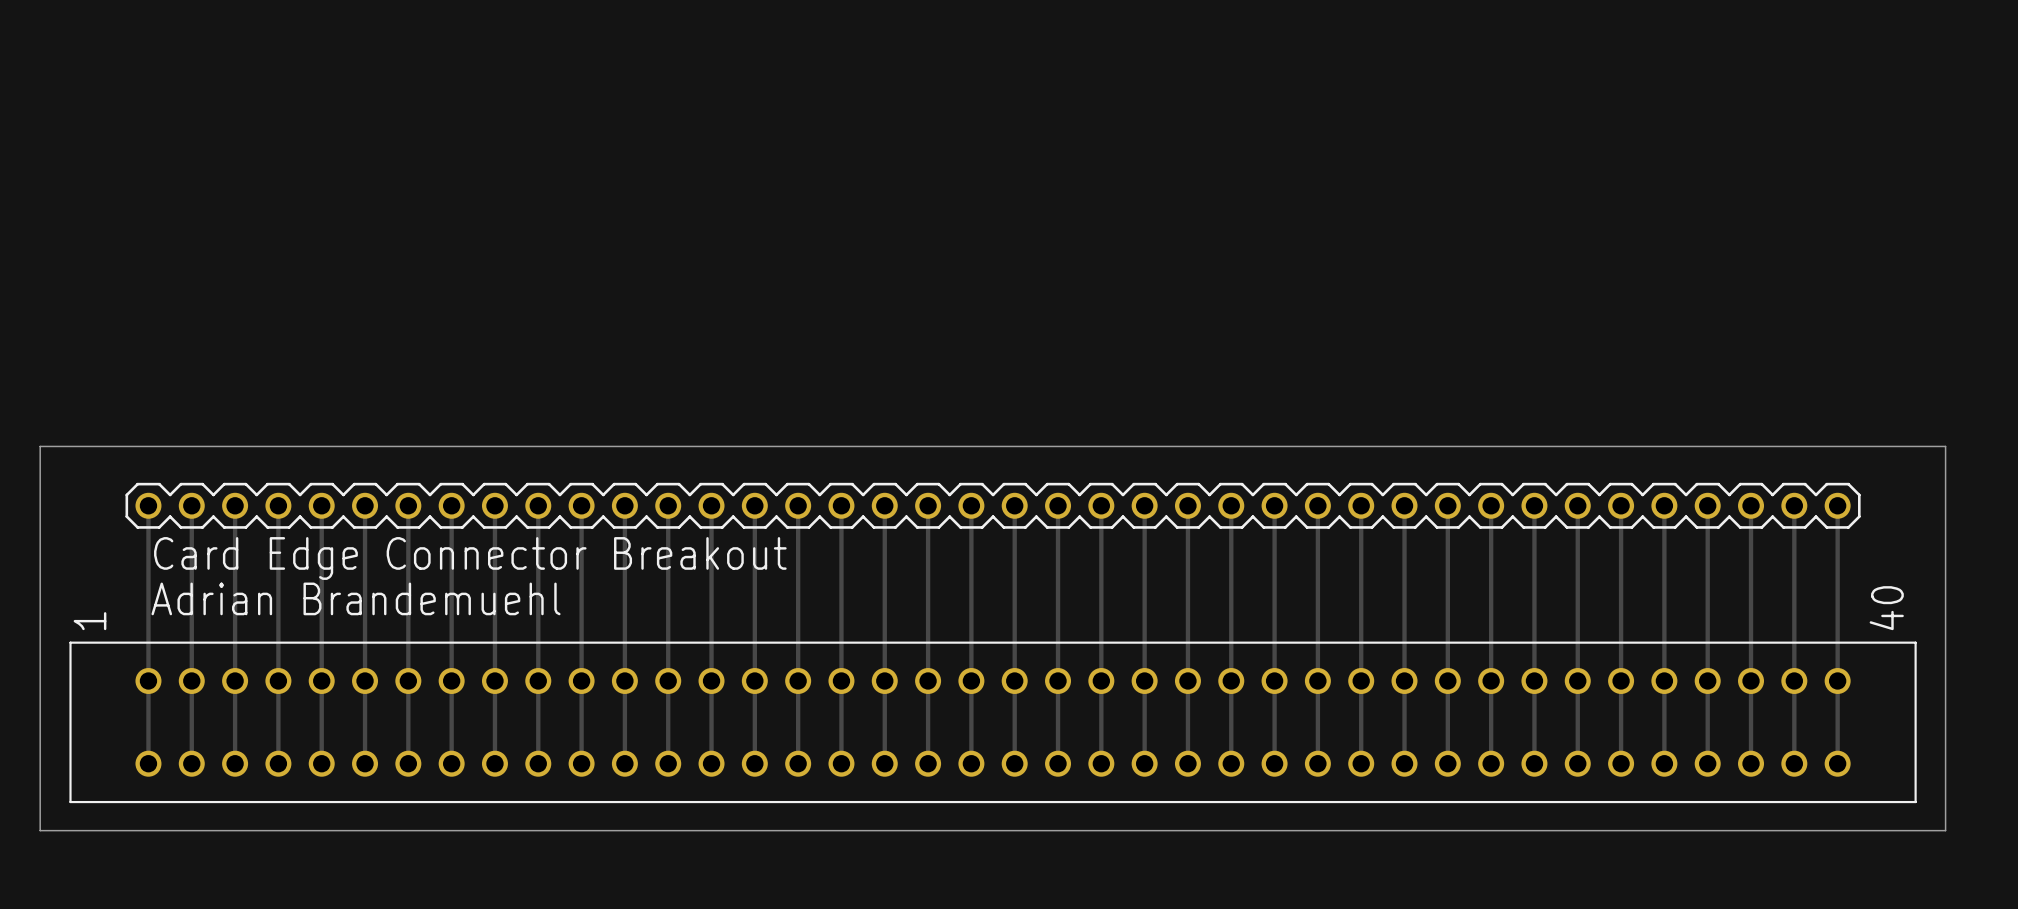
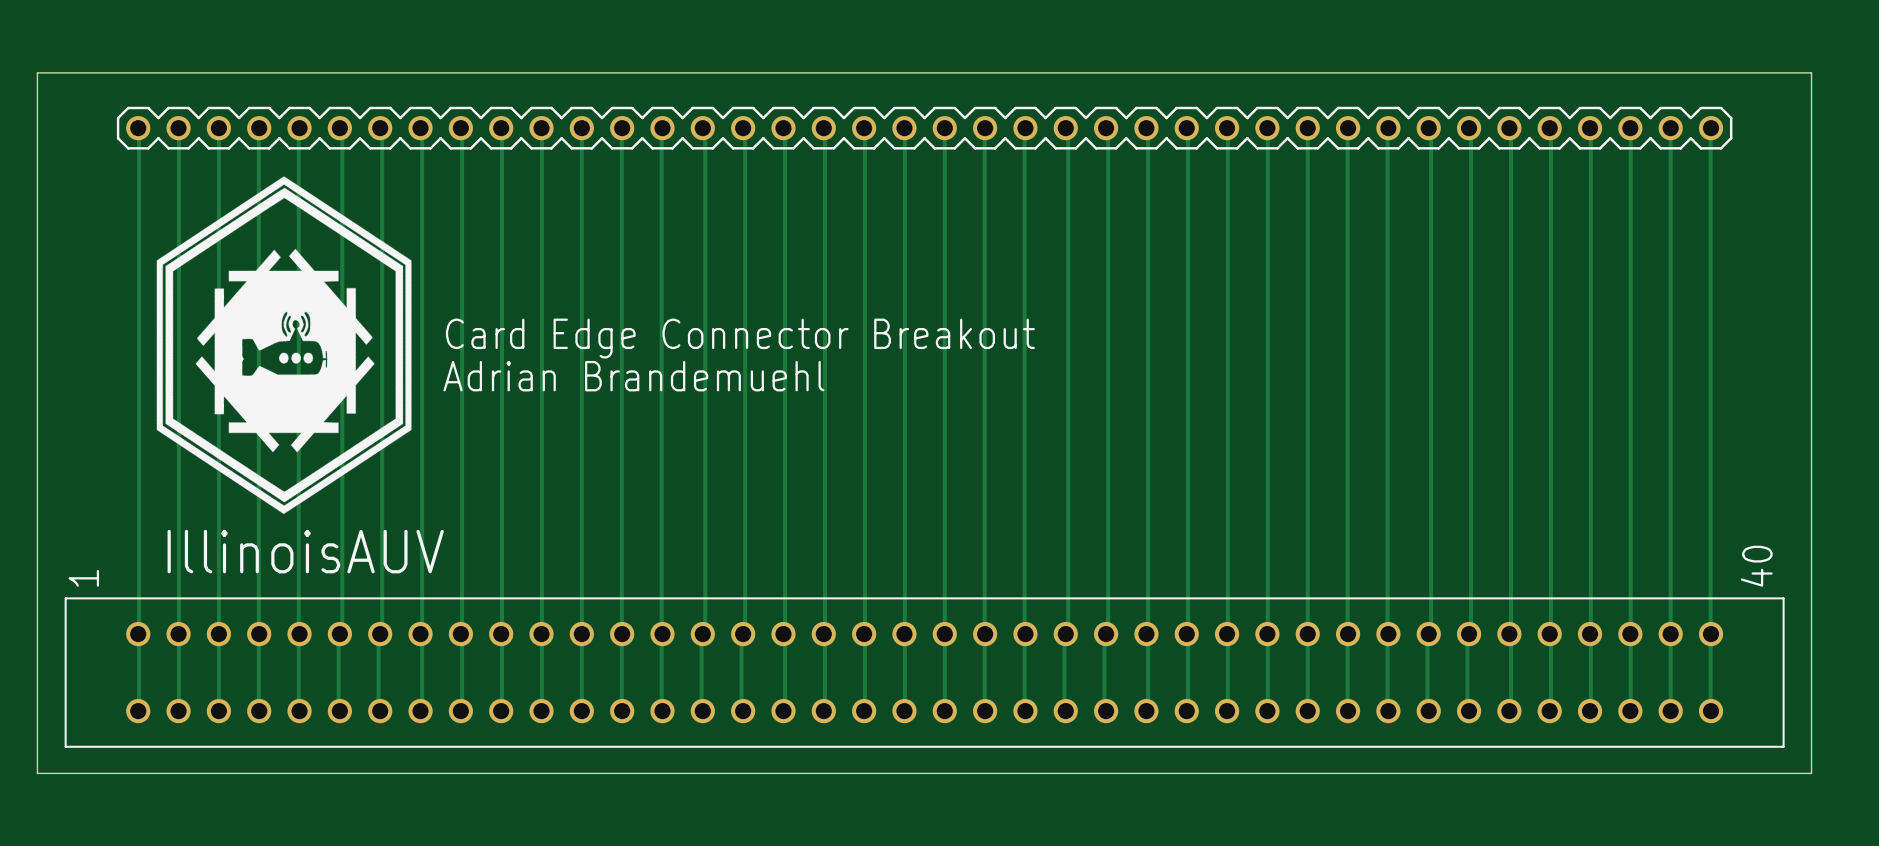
track: none -> (218, 128) (218, 470)
track: none -> (581, 128) (581, 470)
track: none -> (944, 128) (944, 470)
track: none -> (1307, 128) (1307, 470)
track: none -> (1670, 128) (1670, 470)
drawing: none -> [156, 176, 412, 514]
board edge: (40, 446) (1945, 446) -> (37, 415) (37, 72) (1811, 72) (1811, 415)
track: (148, 505) (148, 763) -> (138, 128) (138, 711)
track: (191, 505) (191, 763) -> (178, 128) (178, 711)
track: (278, 505) (278, 763) -> (259, 128) (259, 711)
track: (321, 505) (321, 763) -> (299, 128) (299, 711)
track: (365, 505) (365, 763) -> (339, 128) (342, 130) (342, 631) (338, 635) (339, 711)
track: (408, 505) (408, 763) -> (380, 128) (382, 130) (382, 631) (378, 635) (378, 708) (380, 711)
track: (451, 505) (451, 763) -> (420, 128) (422, 130) (422, 631) (420, 634) (422, 635) (422, 708) (420, 711)
track: (494, 505) (494, 763) -> (460, 128) (460, 711)
track: (538, 505) (538, 763) -> (501, 128) (501, 711)
track: (581, 505) (581, 763) -> (541, 128) (541, 711)
track: (668, 505) (668, 763) -> (622, 128) (622, 711)
track: (711, 505) (711, 763) -> (662, 128) (662, 711)
track: (754, 505) (754, 763) -> (702, 128) (705, 130) (705, 631) (701, 635) (702, 711)
track: (798, 505) (798, 763) -> (743, 128) (745, 130) (745, 631) (741, 635) (741, 708) (743, 711)
track: (841, 505) (841, 763) -> (783, 128) (785, 130) (785, 631) (783, 634) (785, 635) (785, 708) (783, 711)
track: (884, 505) (884, 763) -> (823, 128) (823, 711)
track: (928, 505) (928, 763) -> (864, 128) (864, 711)
track: (971, 505) (971, 763) -> (904, 128) (904, 711)
part position: (993, 505) -> (924, 128)
track: (1058, 505) (1058, 763) -> (985, 128) (985, 711)
track: (1101, 505) (1101, 763) -> (1025, 128) (1025, 711)
track: (1144, 505) (1144, 763) -> (1065, 128) (1068, 130) (1068, 631) (1064, 635) (1065, 711)
track: (1187, 505) (1187, 763) -> (1106, 128) (1108, 130) (1108, 631) (1104, 635) (1104, 708) (1106, 711)
track: (1231, 505) (1231, 763) -> (1146, 128) (1148, 130) (1148, 631) (1146, 634) (1148, 635) (1148, 708) (1146, 711)
track: (1274, 505) (1274, 763) -> (1186, 128) (1186, 711)
track: (1317, 505) (1317, 763) -> (1227, 128) (1227, 711)
track: (1361, 505) (1361, 763) -> (1267, 128) (1267, 711)
track: (1447, 505) (1447, 763) -> (1348, 128) (1348, 711)
track: (1491, 505) (1491, 763) -> (1388, 128) (1388, 711)
track: (1534, 505) (1534, 763) -> (1428, 128) (1431, 130) (1431, 631) (1427, 635) (1428, 711)
track: (1577, 505) (1577, 763) -> (1469, 128) (1471, 130) (1471, 631) (1467, 635) (1467, 708) (1469, 711)
track: (1621, 505) (1621, 763) -> (1509, 128) (1510, 130) (1510, 631) (1509, 634) (1510, 635) (1510, 708) (1509, 711)
track: (1664, 505) (1664, 763) -> (1549, 128) (1549, 711)
track: (1707, 505) (1707, 763) -> (1590, 128) (1590, 711)
track: (1751, 505) (1751, 763) -> (1630, 128) (1630, 711)
track: (1837, 505) (1837, 763) -> (1711, 128) (1711, 711)
text position: Card Edge Connector Breakout (470, 558) -> Card Edge Connector Breakout (740, 338)
text position: Adrian Brandemuehl (356, 598) -> Adrian Brandemuehl (633, 376)

